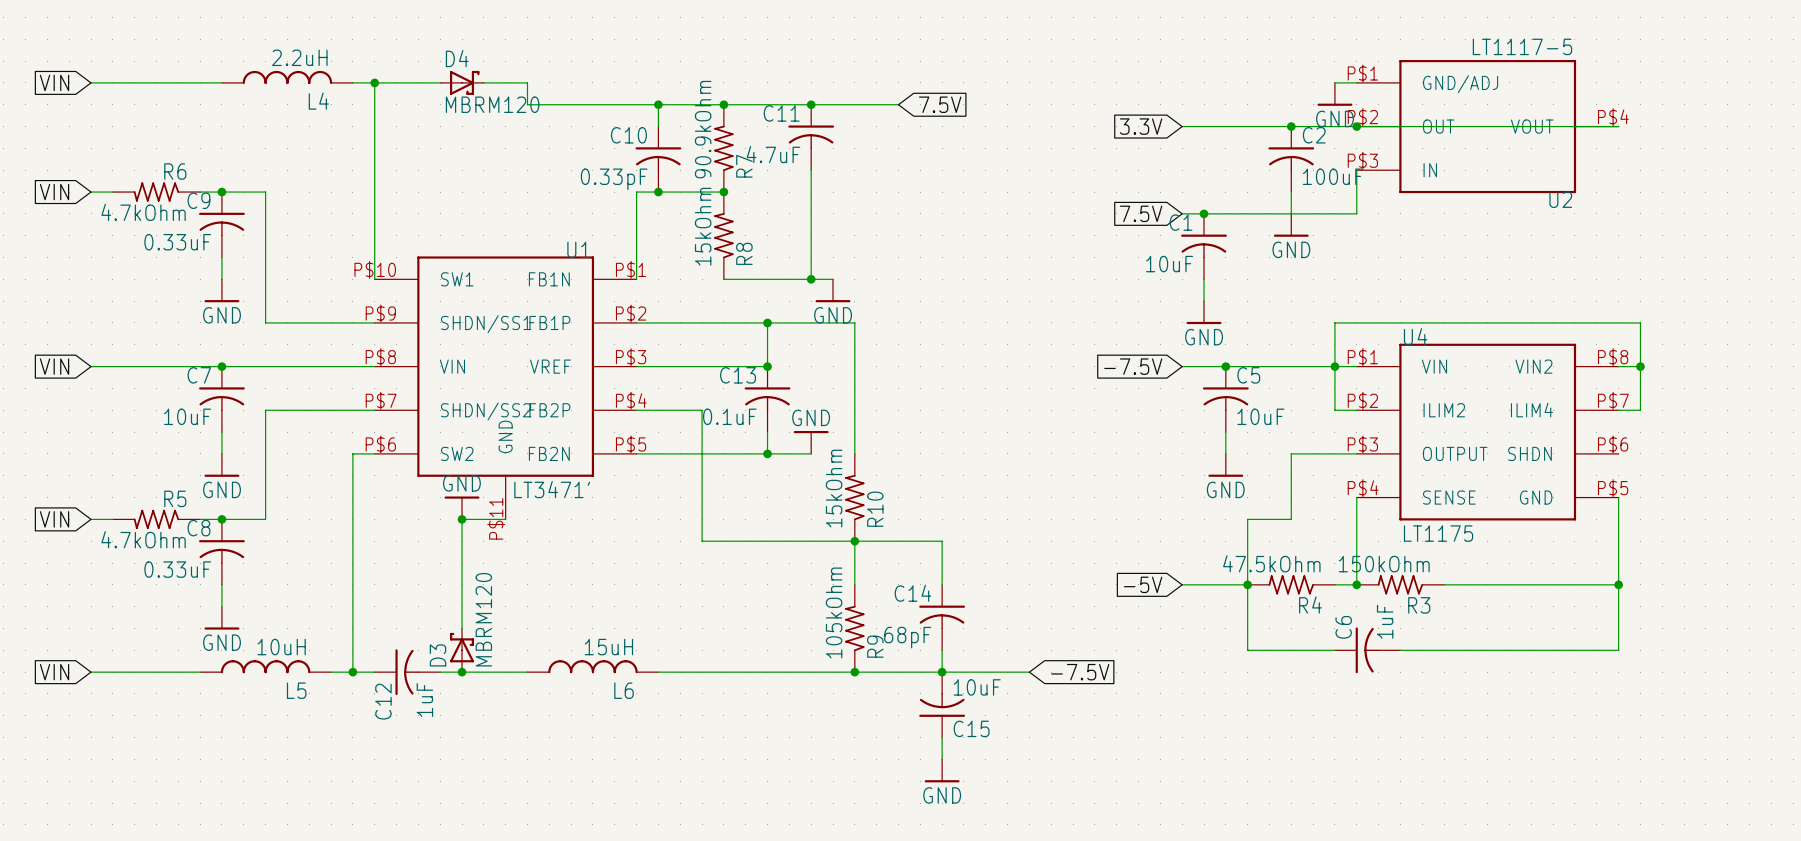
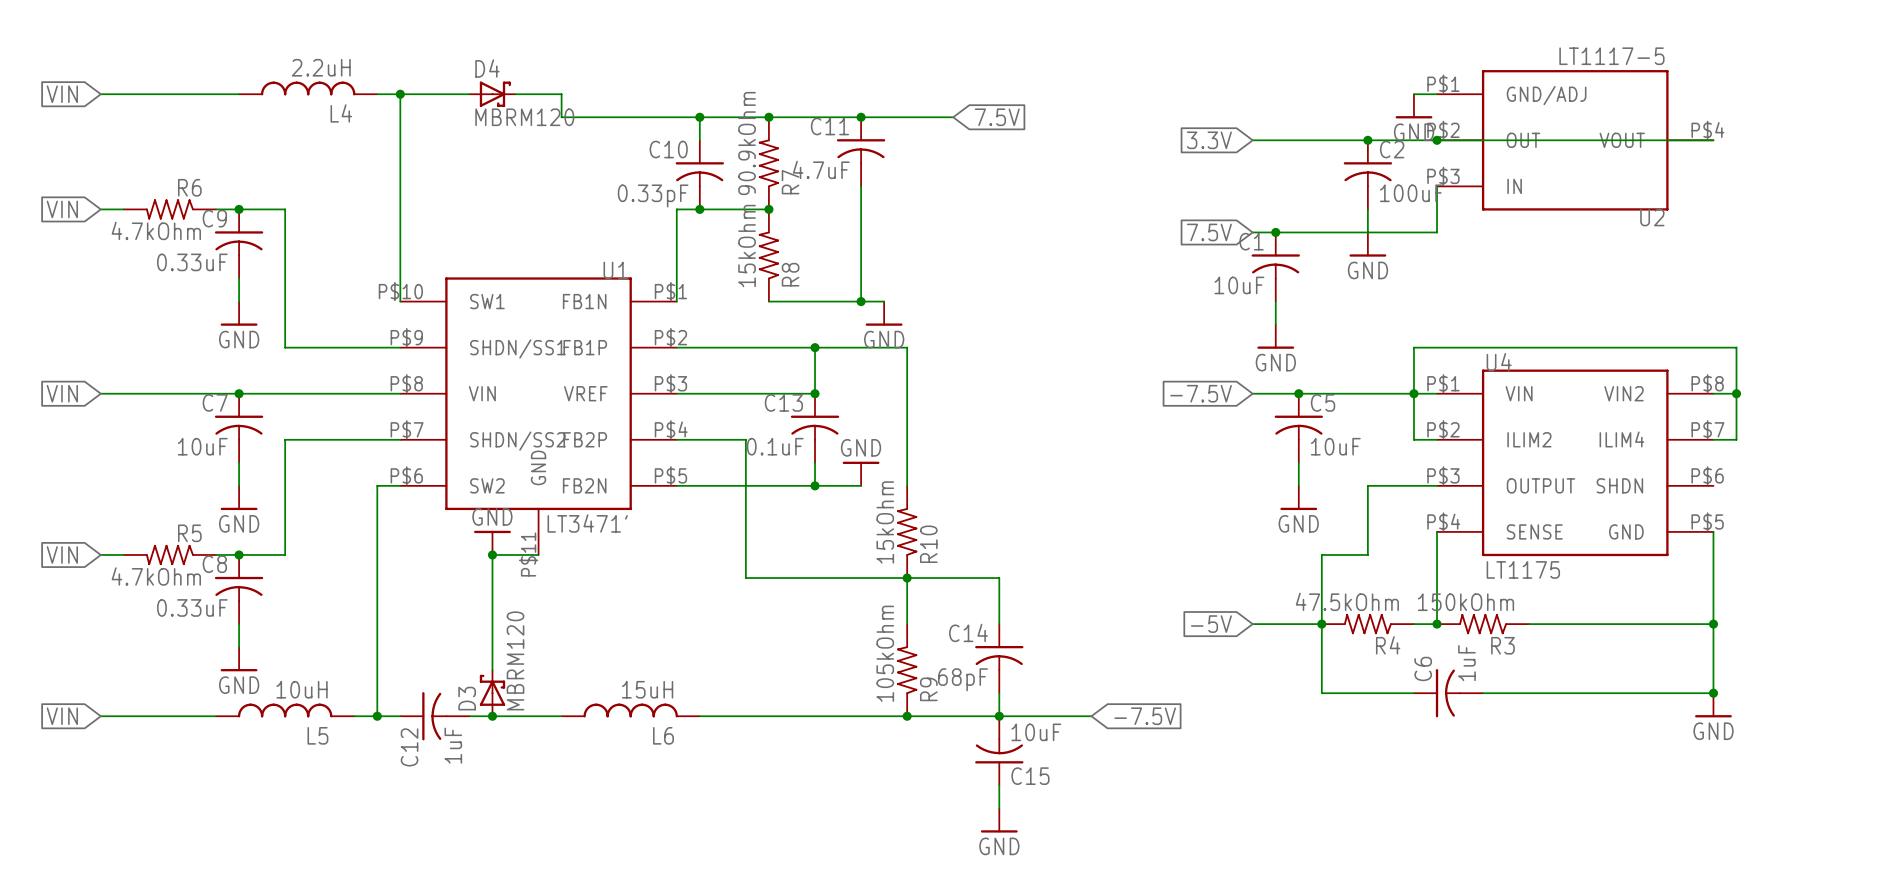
junction: none -> (1713, 693)
power symbol: none -> GND (1713, 705)

